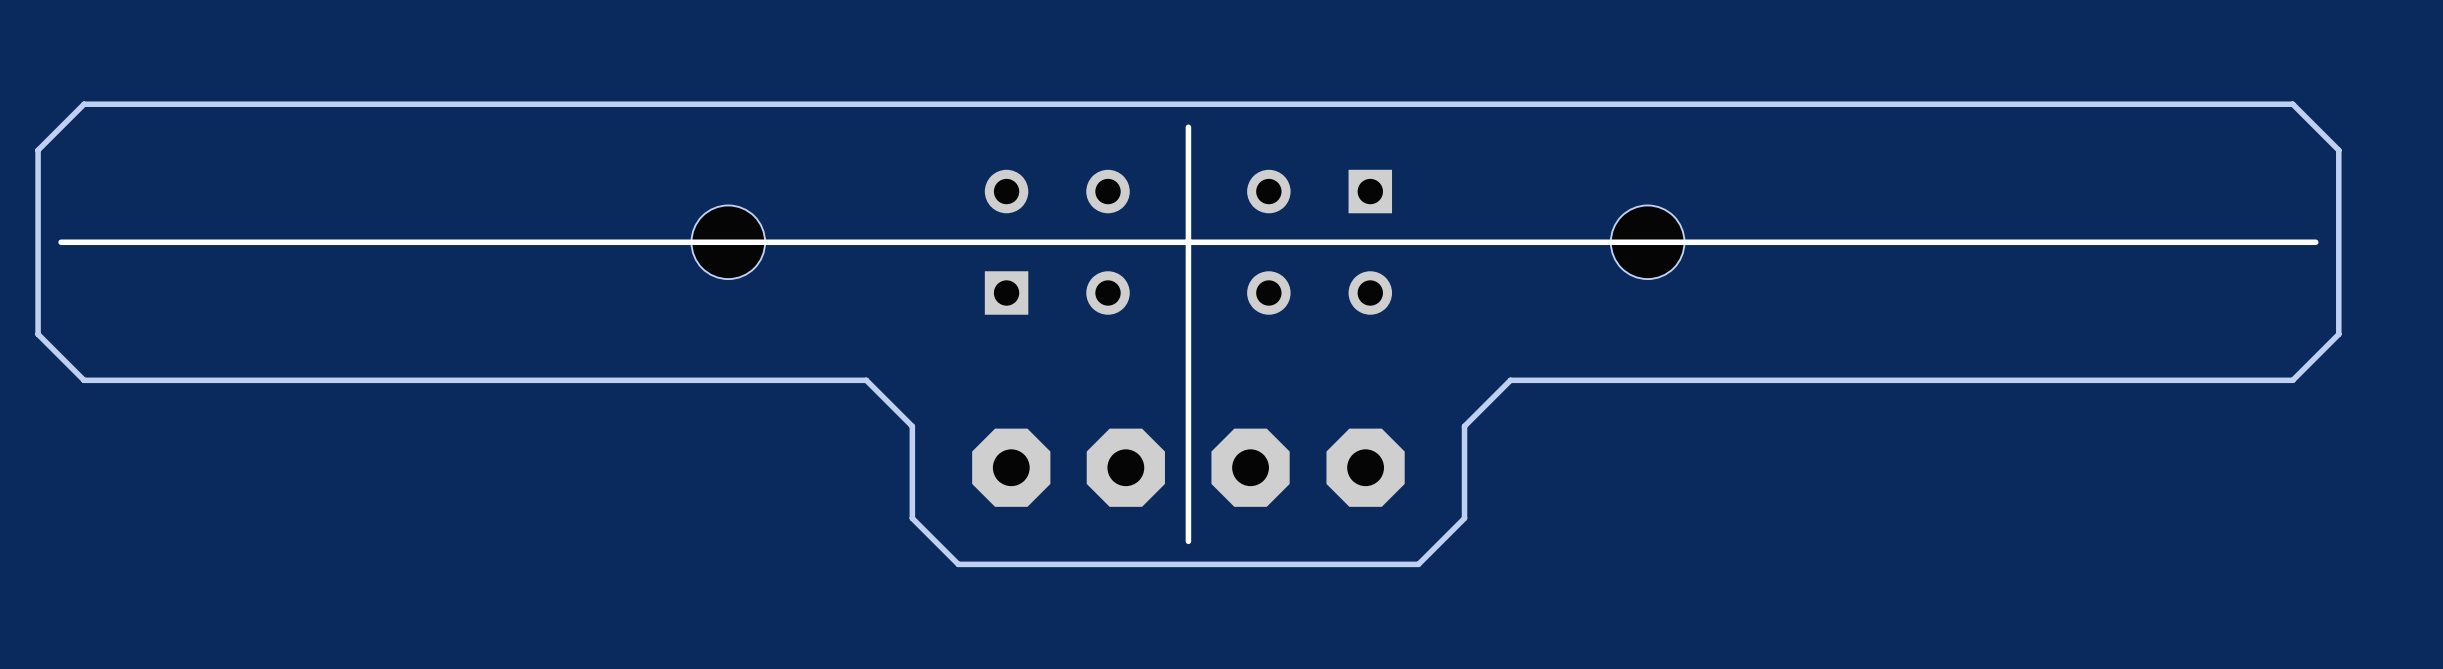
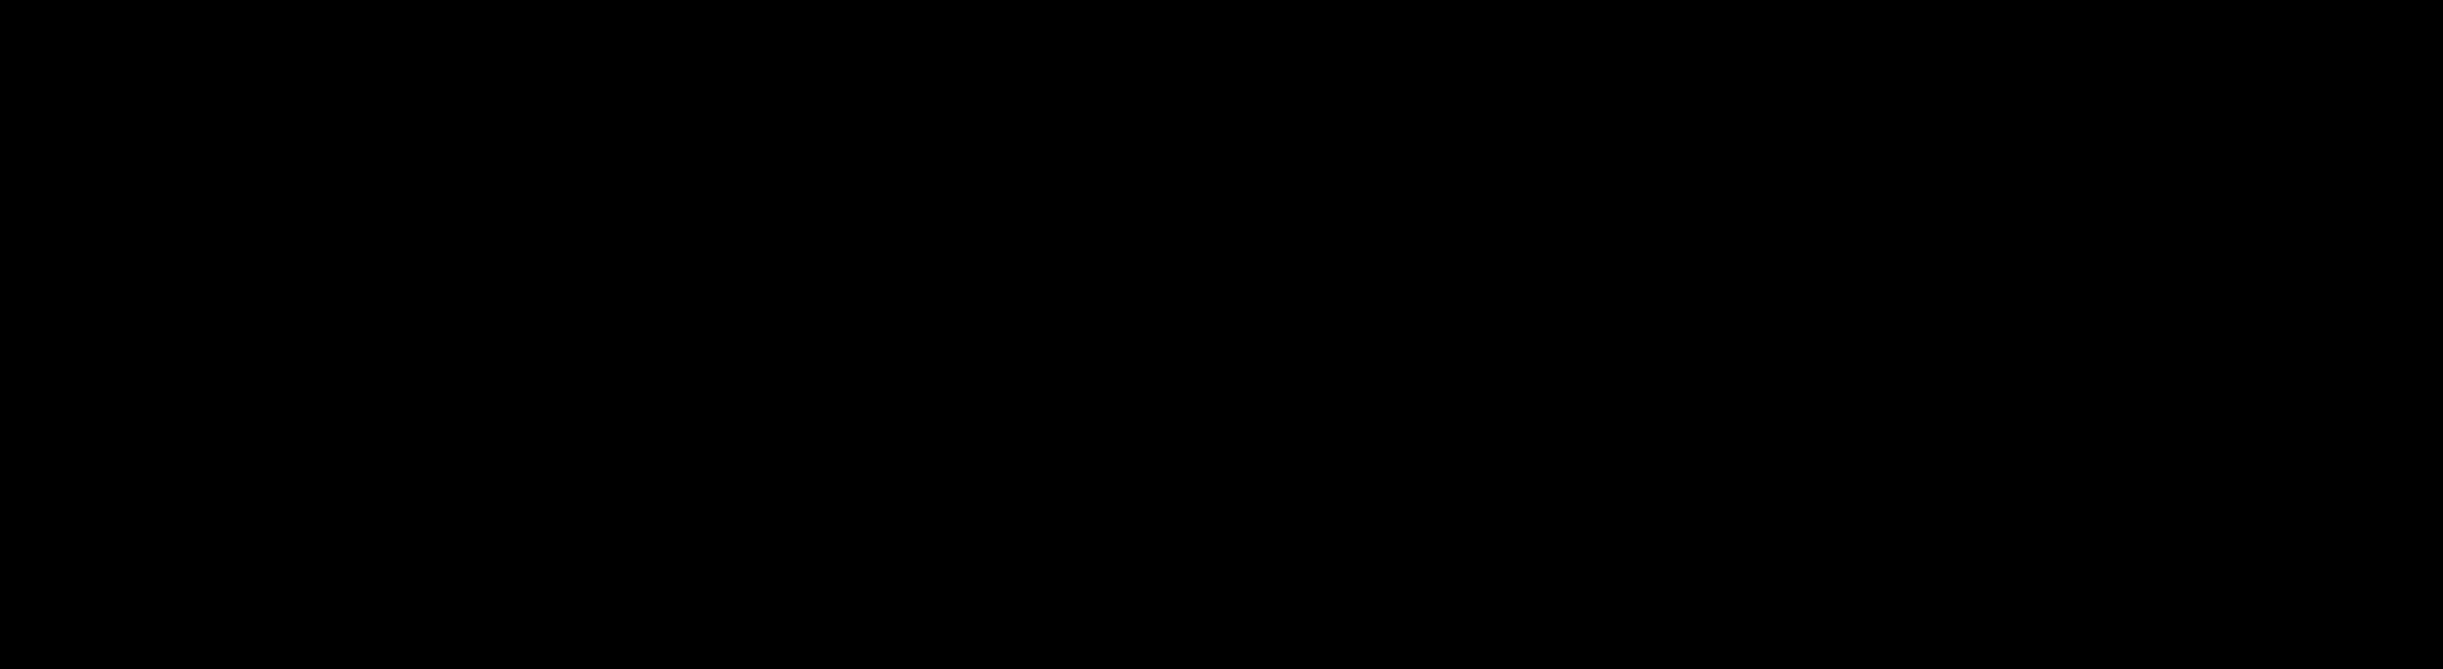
board edge: (2292, 104) (84, 104) (38, 150) (38, 334) (84, 380) (866, 380) (912, 426) (912, 518) (958, 564) (1418, 564) (1464, 518) (1464, 426) (1510, 380) (2292, 380) (2338, 334) (2338, 150) (2292, 104) -> none
line: (1188, 127) (1188, 541) -> none
hole: (728, 242) -> none
part: (1057, 242) -> none
part: (1319, 242) -> none
hole: (1647, 242) -> none
line: (2315, 242) (61, 242) -> none
part: (1011, 467) -> none
part: (1125, 467) -> none
part: (1250, 467) -> none
part: (1365, 467) -> none

